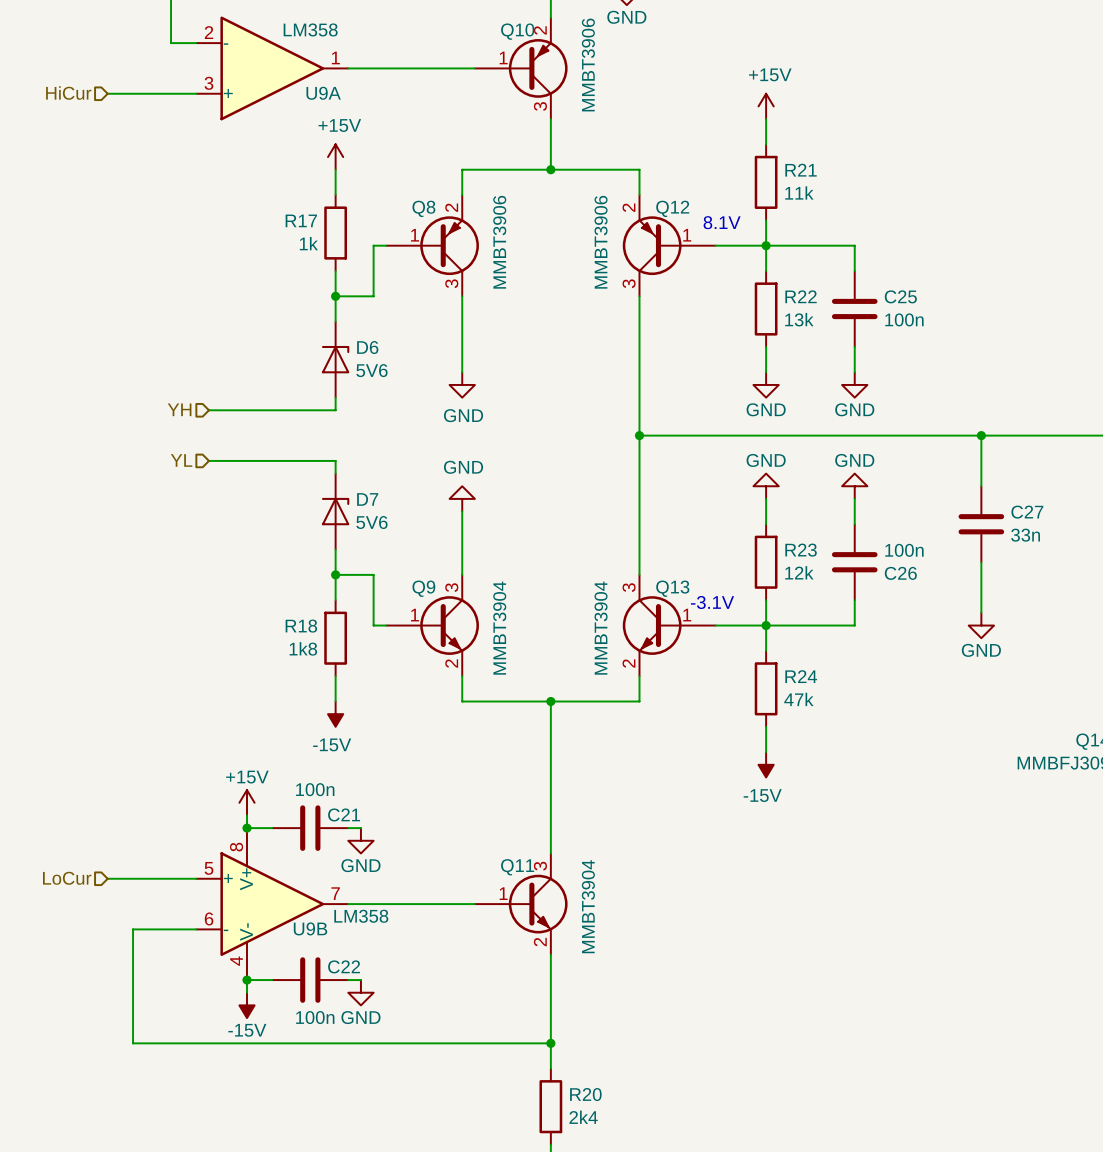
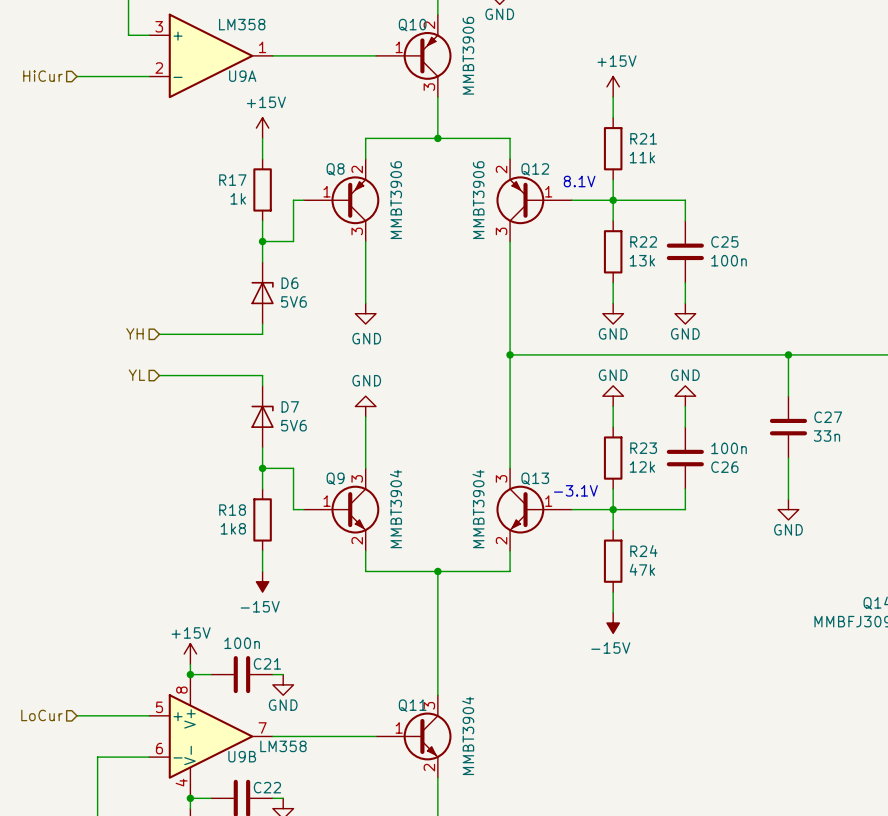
U9A flip: as is (272, 68) -> up-down (211, 55)

